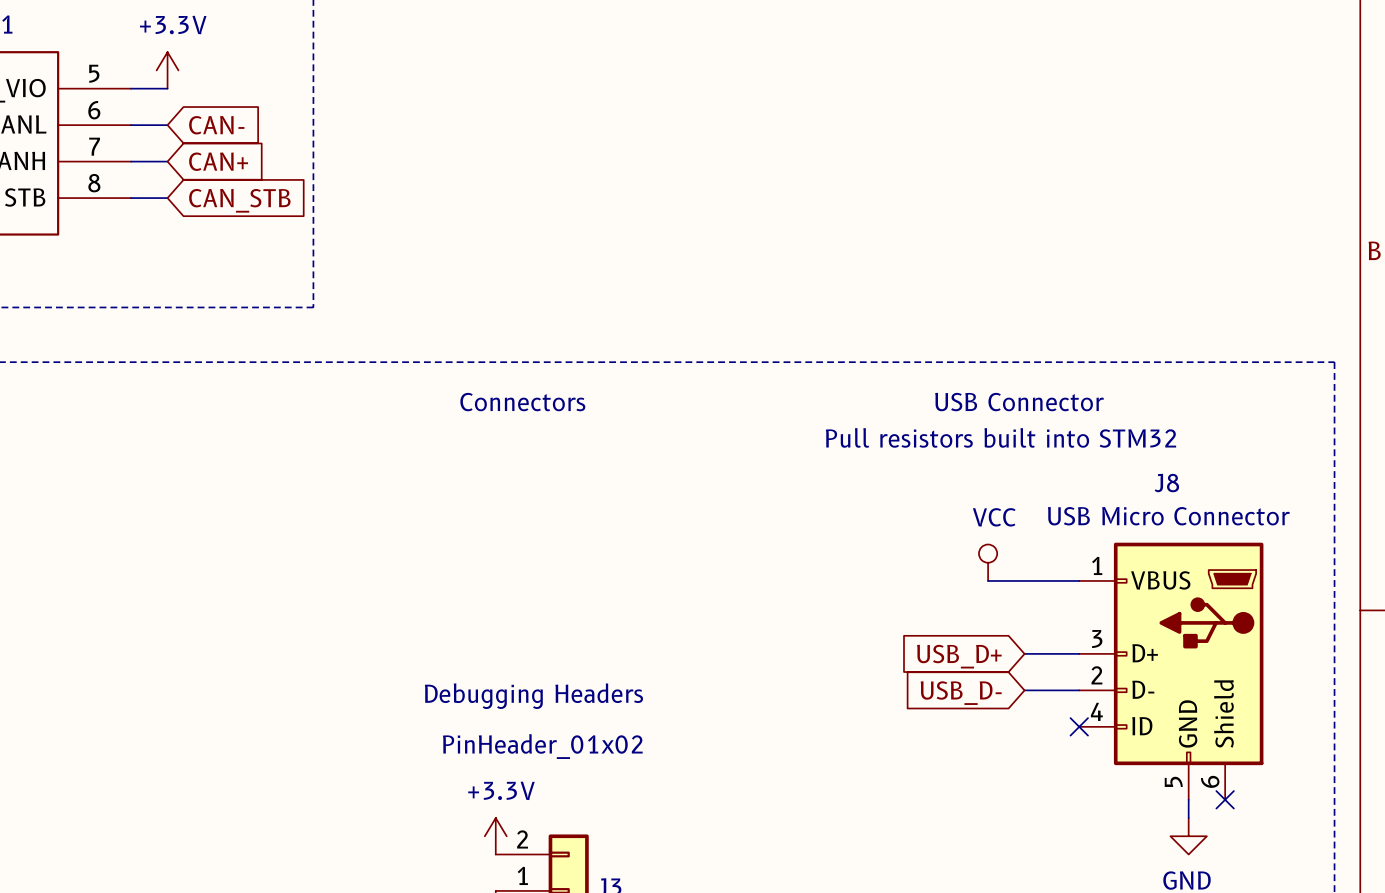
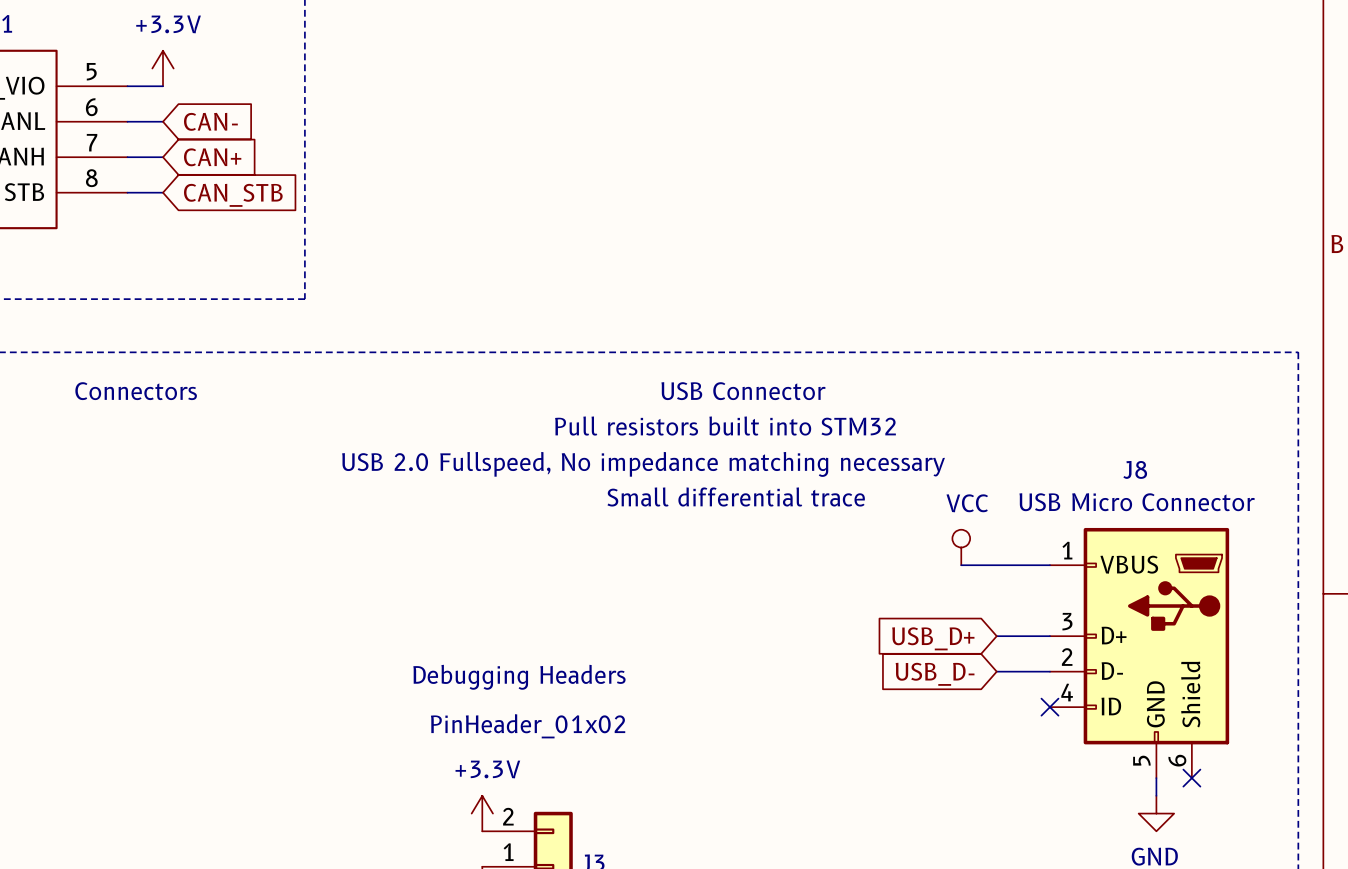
text: none -> Connectors (136, 391)
text: Connectors (522, 402) -> none
text position: USB Connector (1019, 402) -> USB Connector (743, 391)
text position: Pull resistors built into STM32 (1000, 437) -> Pull resistors built into STM32 (725, 426)
text: none -> USB 2.0 Fullspeed, No impedance matching necessary (643, 464)
text: none -> Small differential trace (736, 496)

